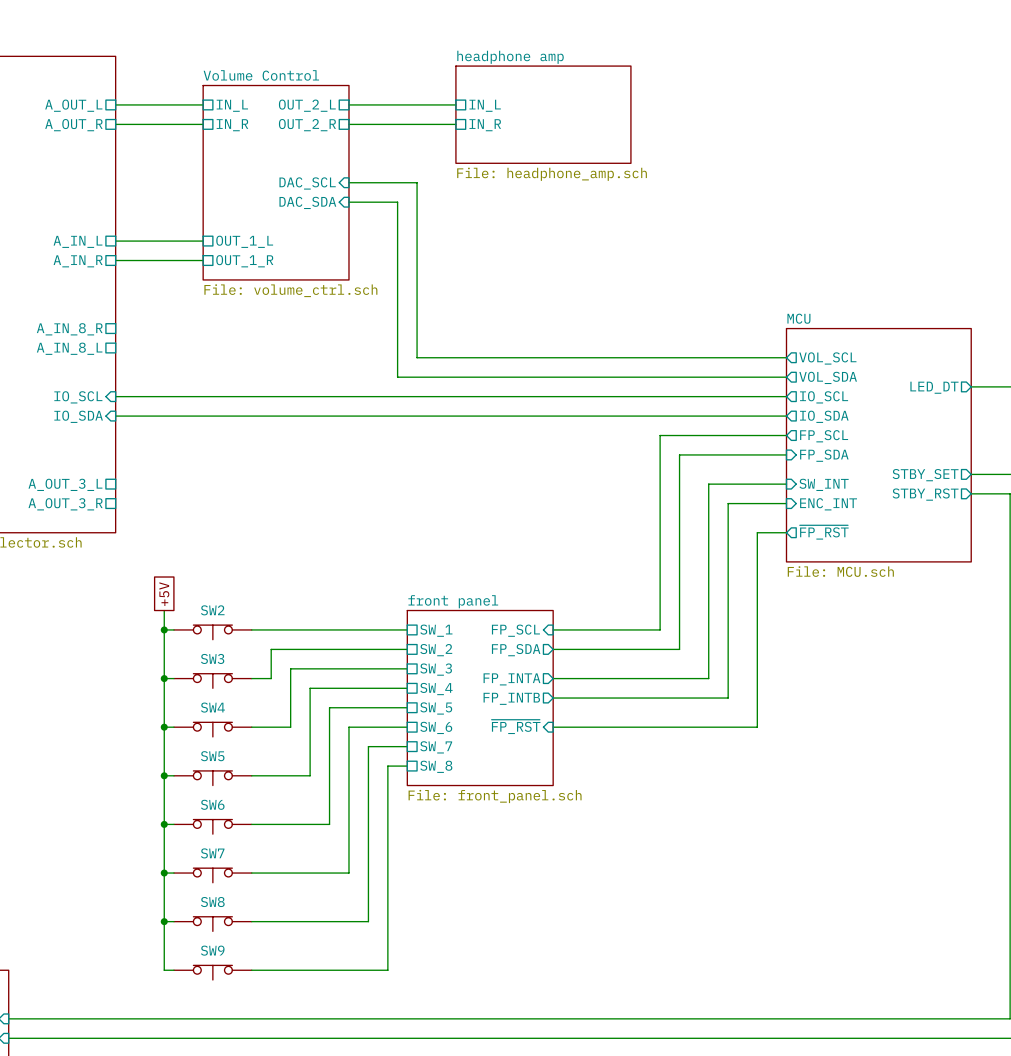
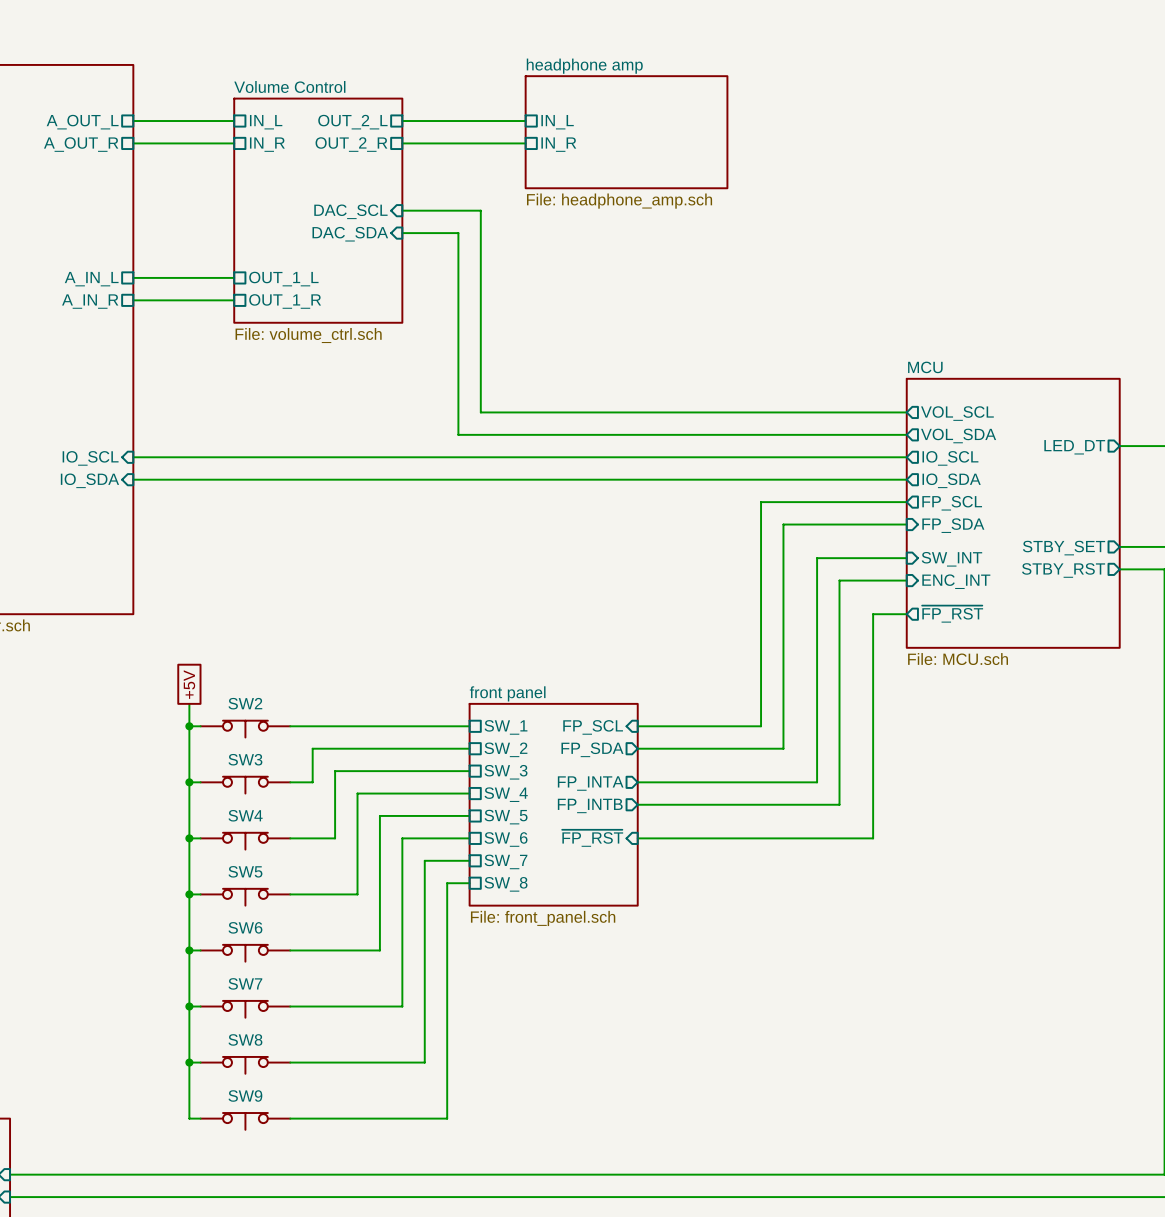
sheet pin: A_IN_8_R (69, 329) -> none
sheet pin: A_IN_8_L (69, 348) -> none
sheet pin: A_OUT_3_L (65, 484) -> none
sheet pin: A_OUT_3_R (65, 504) -> none

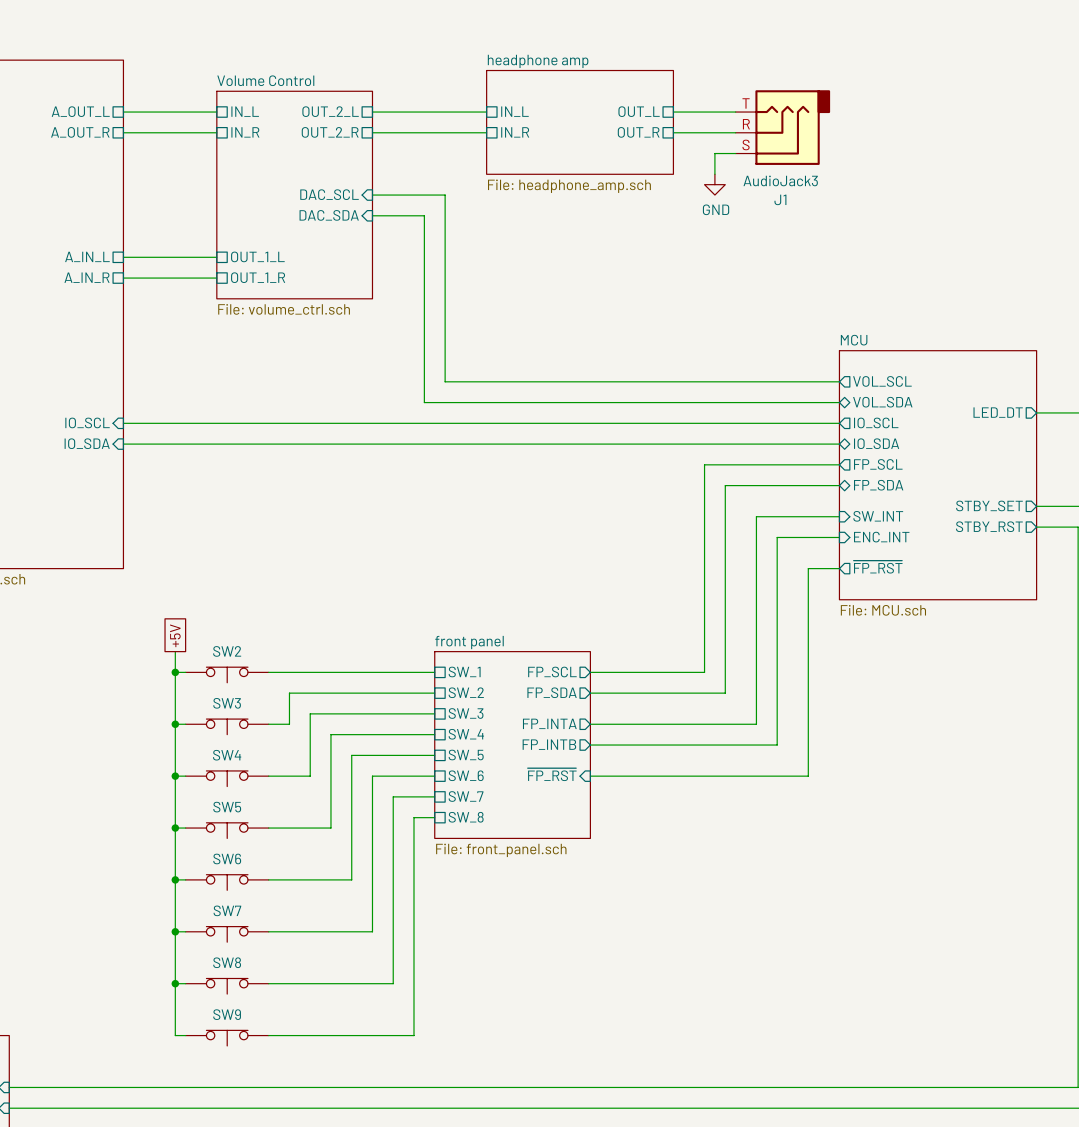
wire: none -> (673, 112) (735, 112)
sheet pin: none -> OUT_L (639, 111)
J1: none -> AudioJack3 (782, 127)
wire: none -> (673, 132) (735, 132)
sheet pin: none -> OUT_R (638, 132)
wire: none -> (735, 153) (714, 153) (714, 174)
power symbol: none -> GND (714, 184)
sheet pin shape: output (958, 435) -> bidirectional (882, 402)
sheet pin shape: output (951, 480) -> bidirectional (876, 443)
sheet pin shape: input (953, 525) -> bidirectional (878, 485)
sheet pin shape: input (593, 727) -> output (552, 672)

